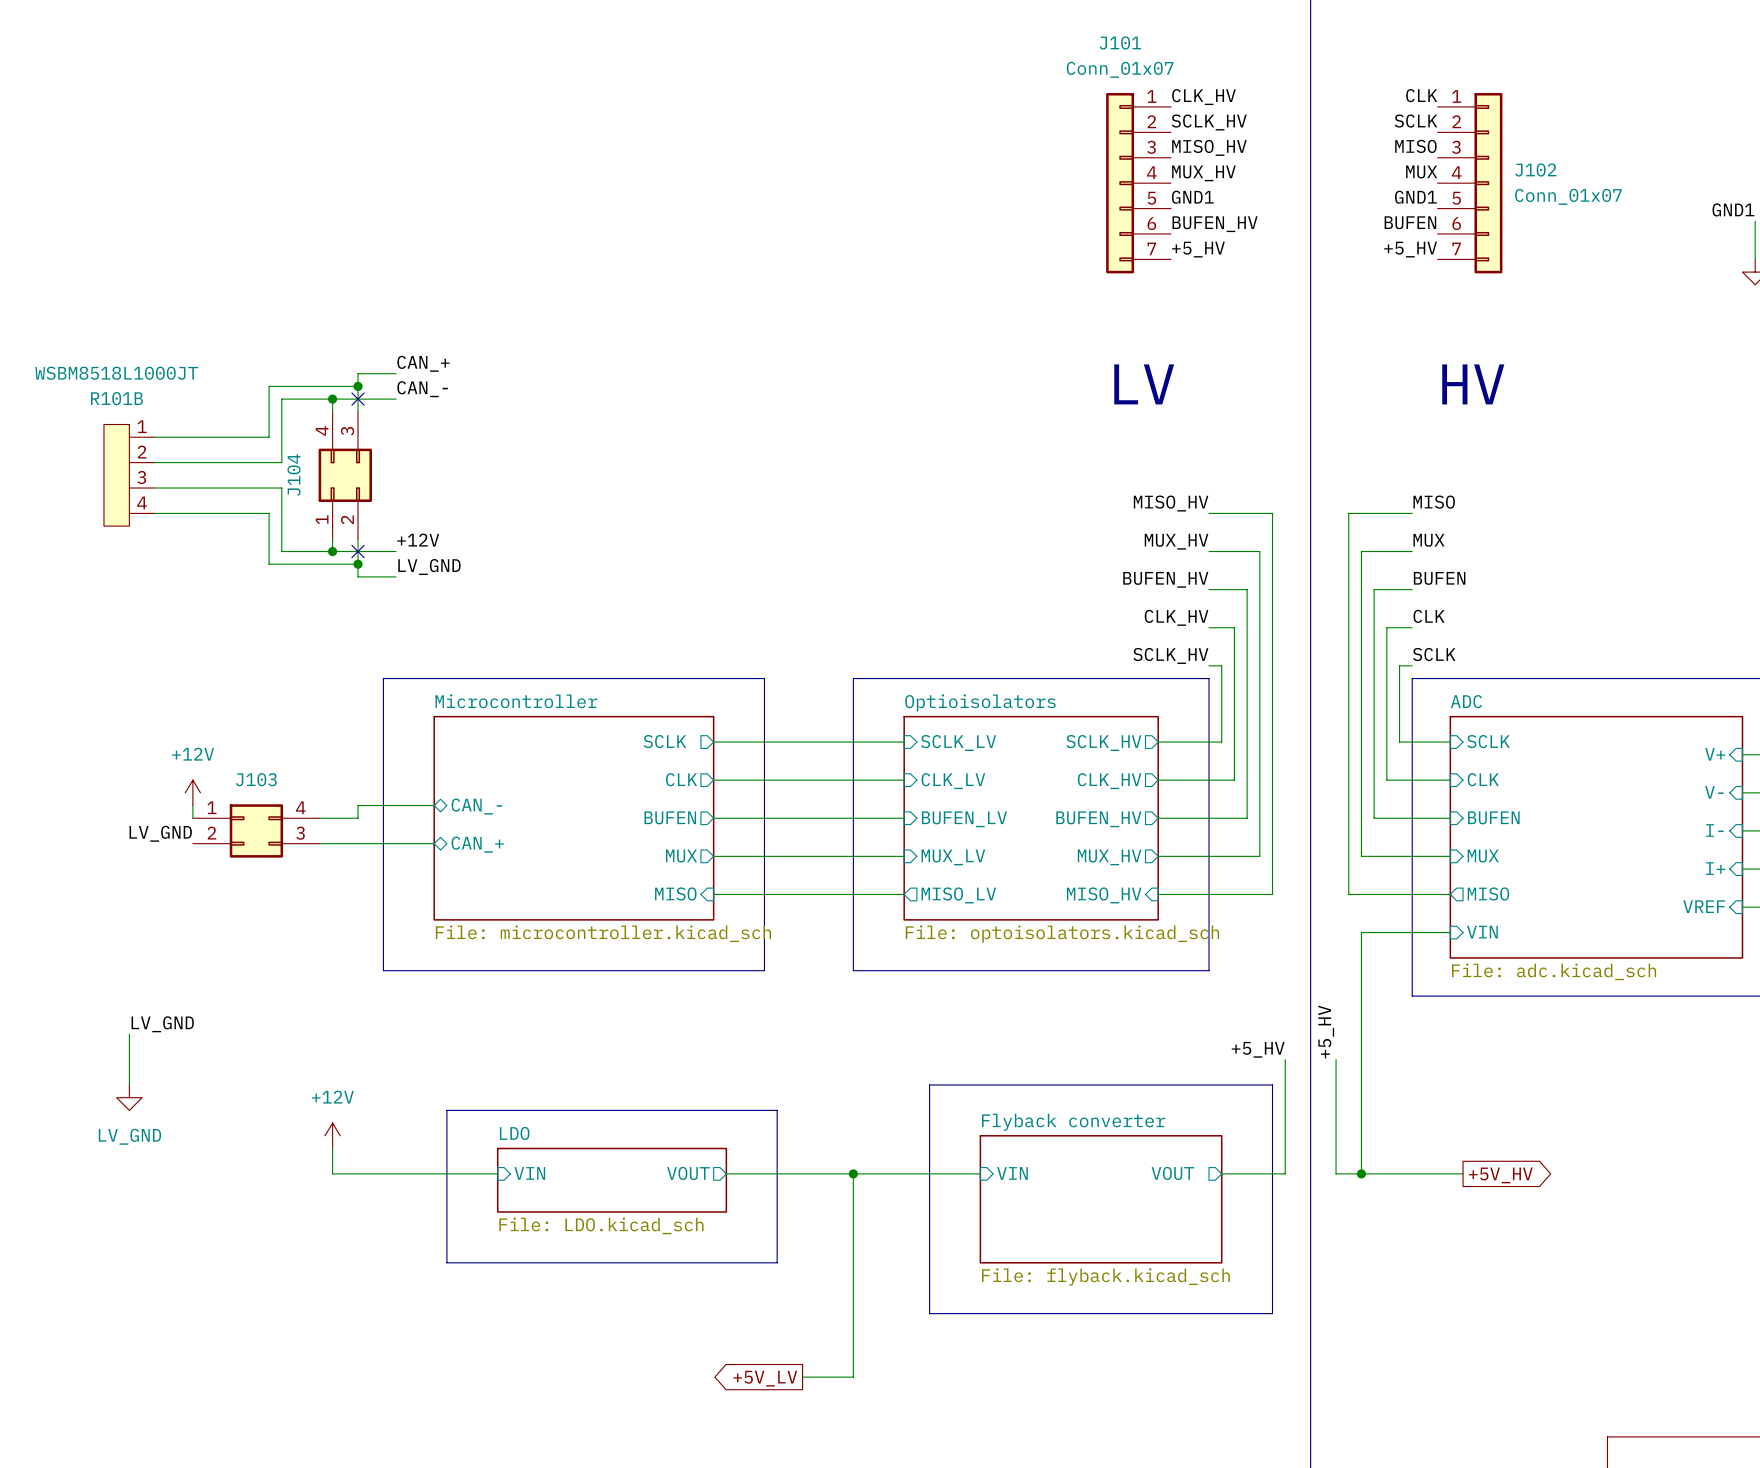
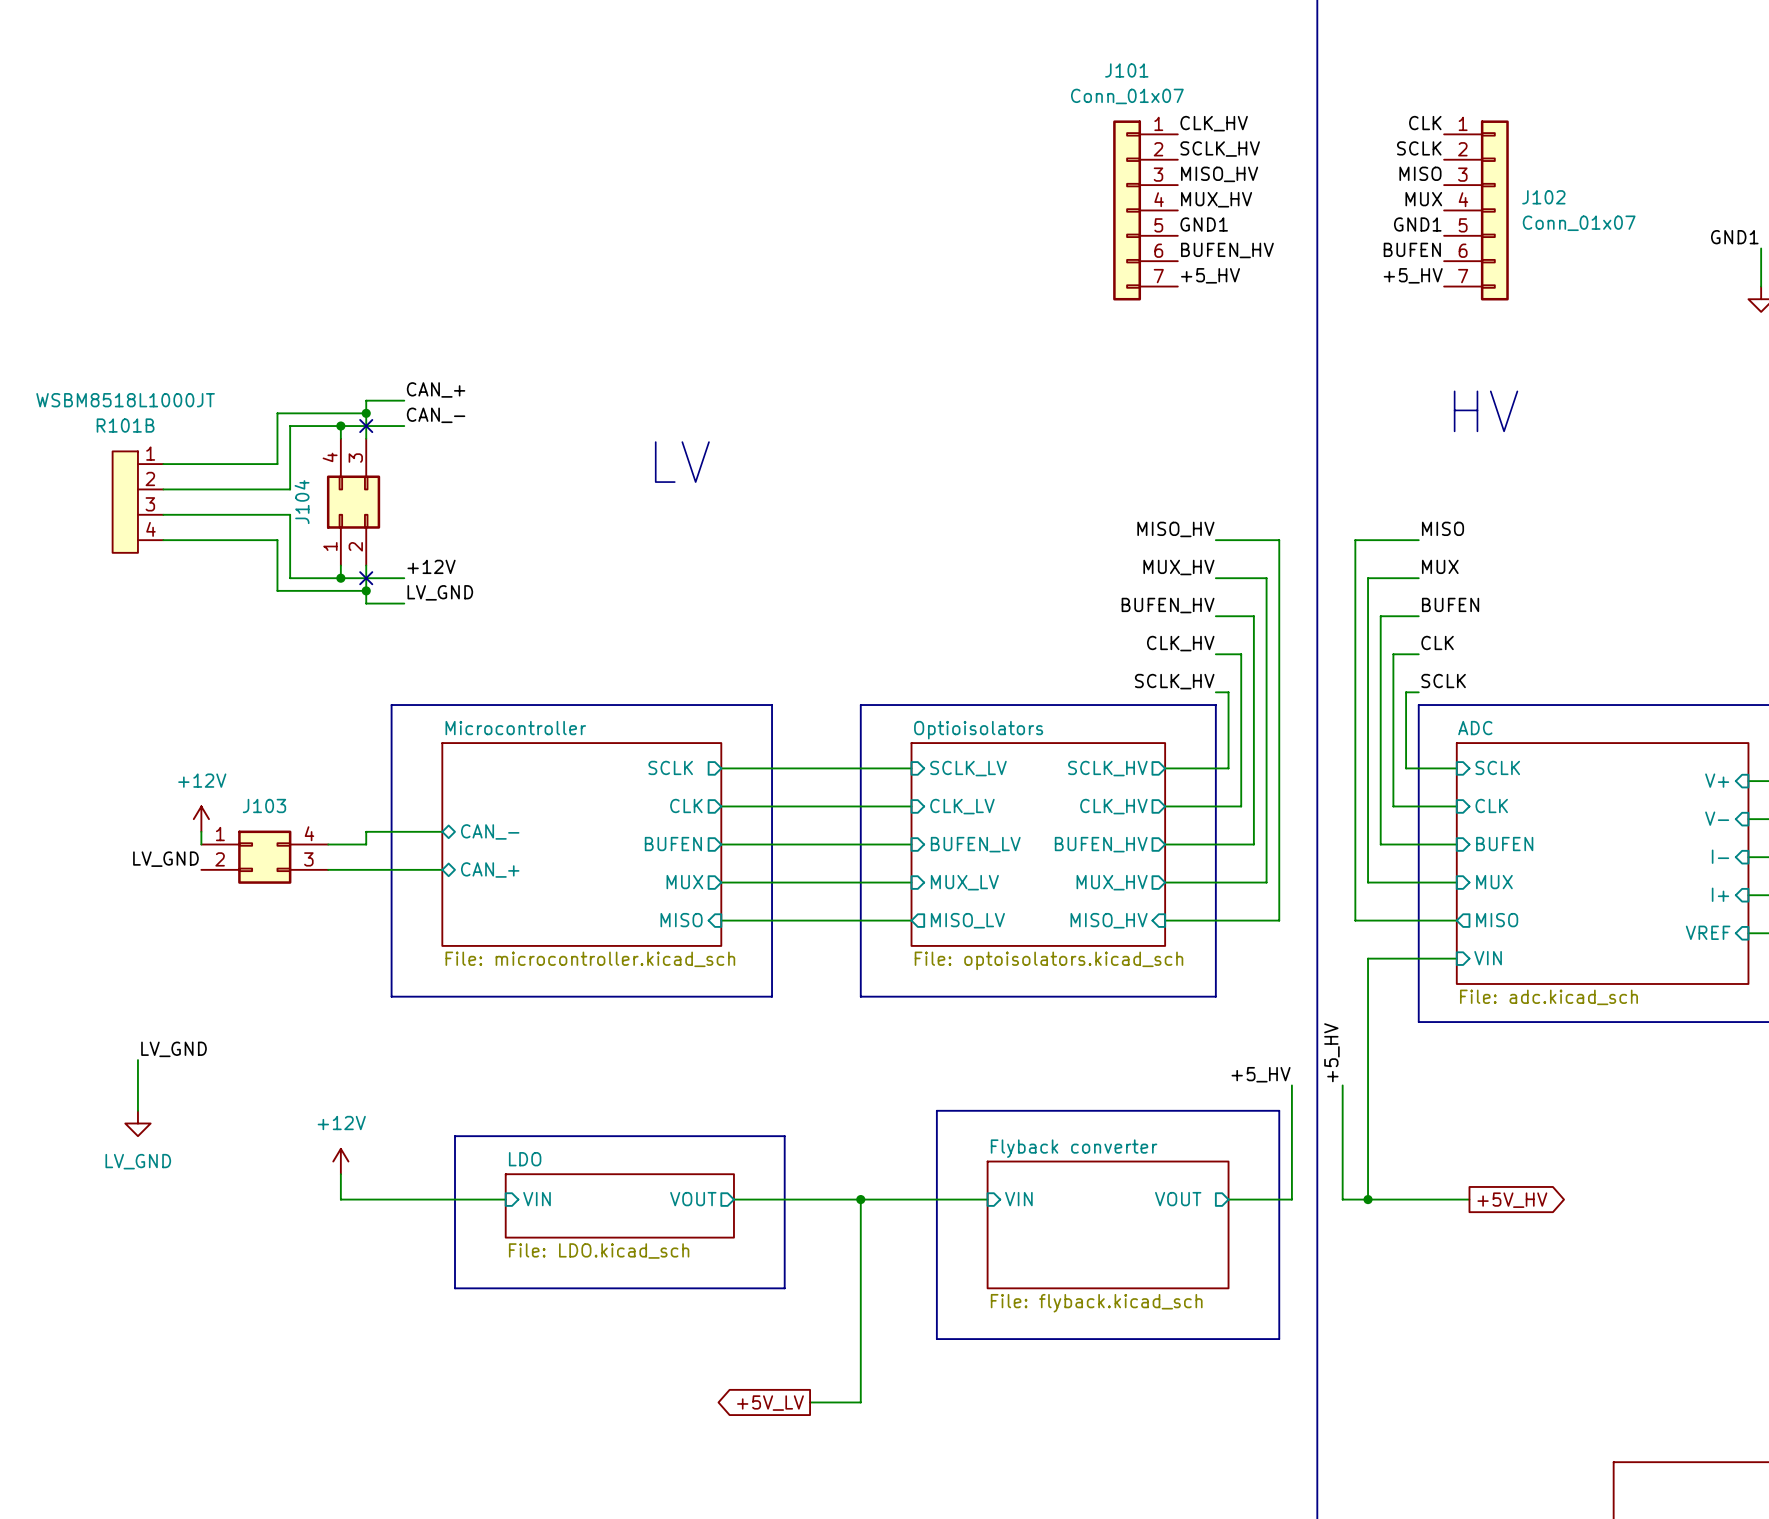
text: LV (1144, 384) -> none
text: none -> LV (682, 462)

